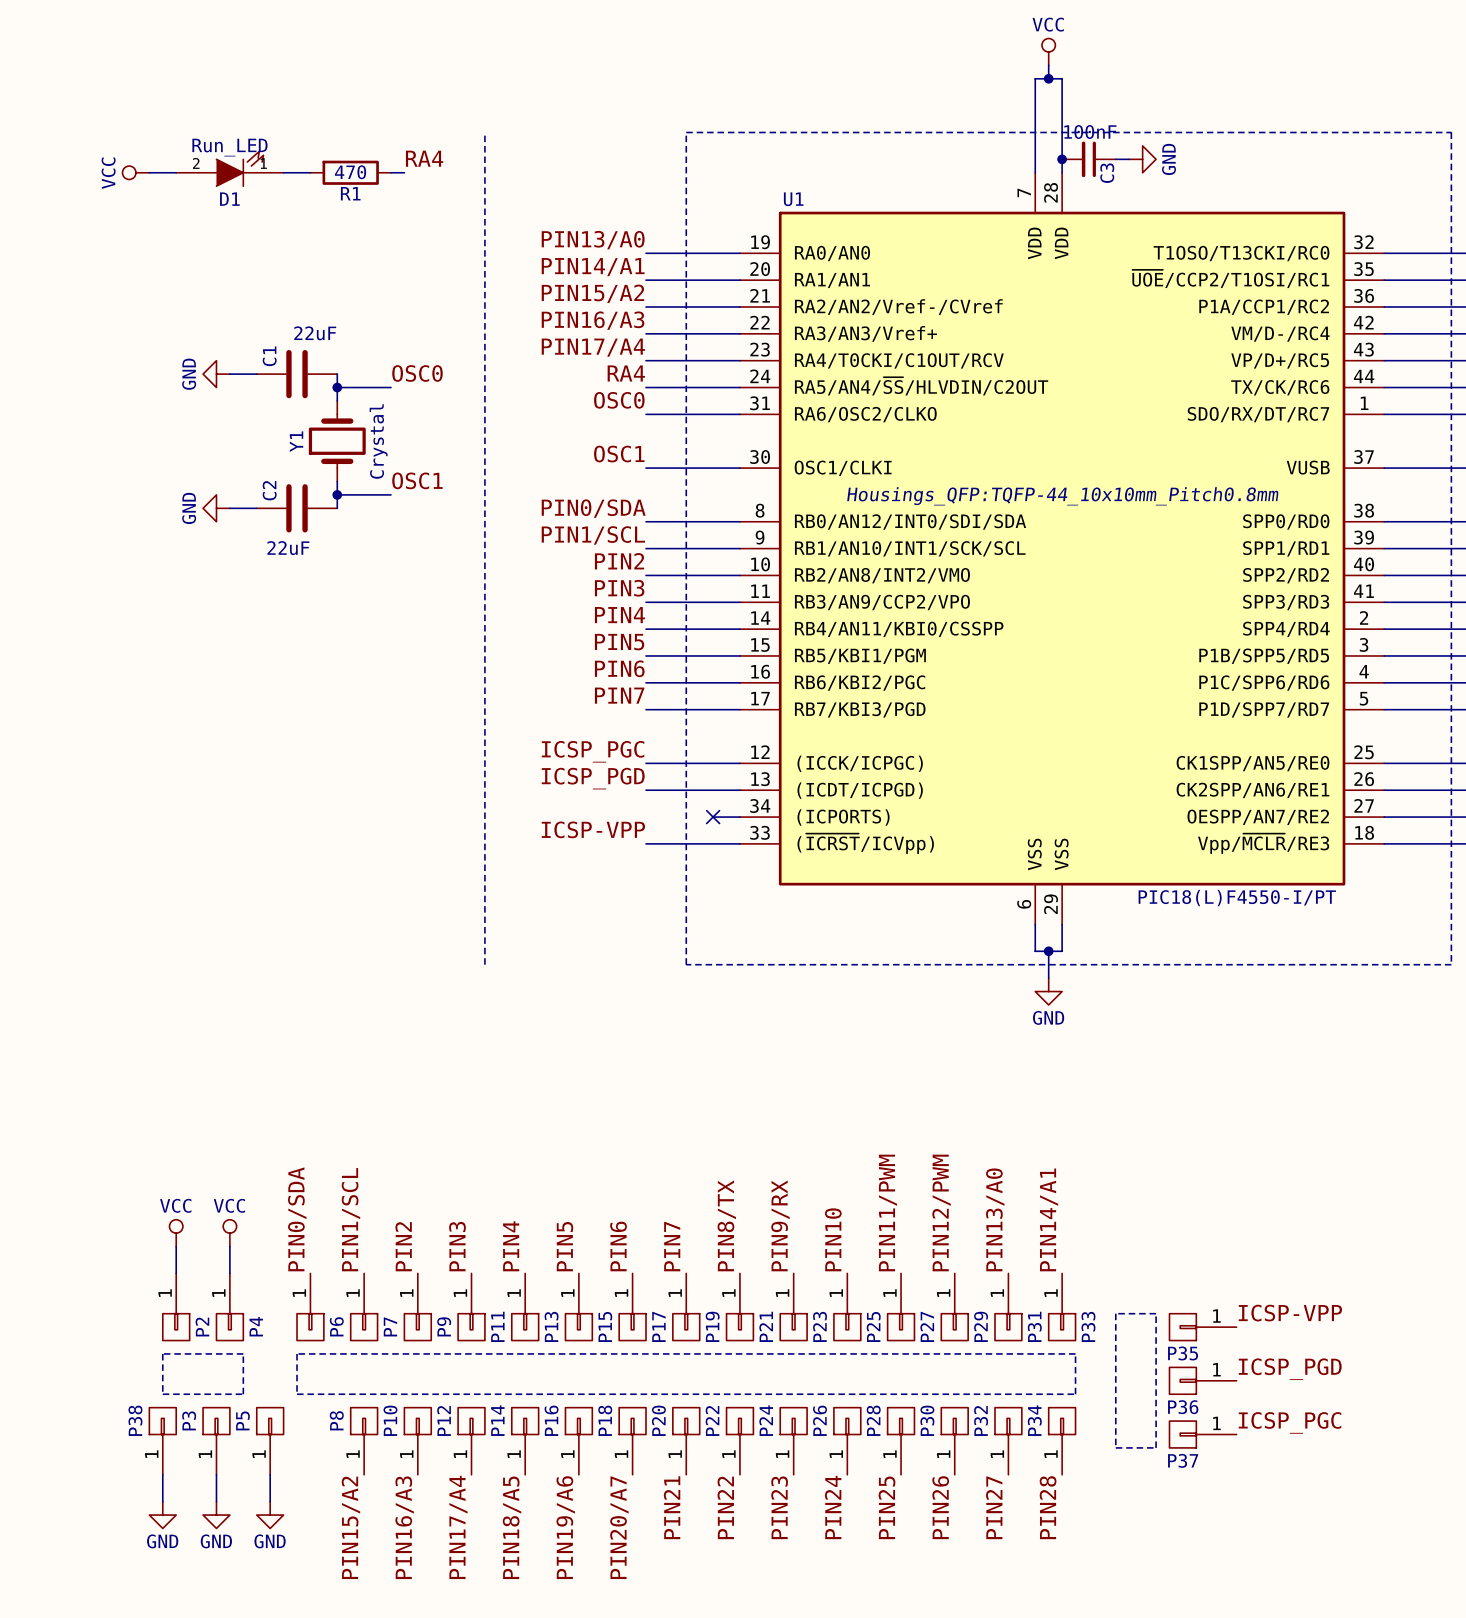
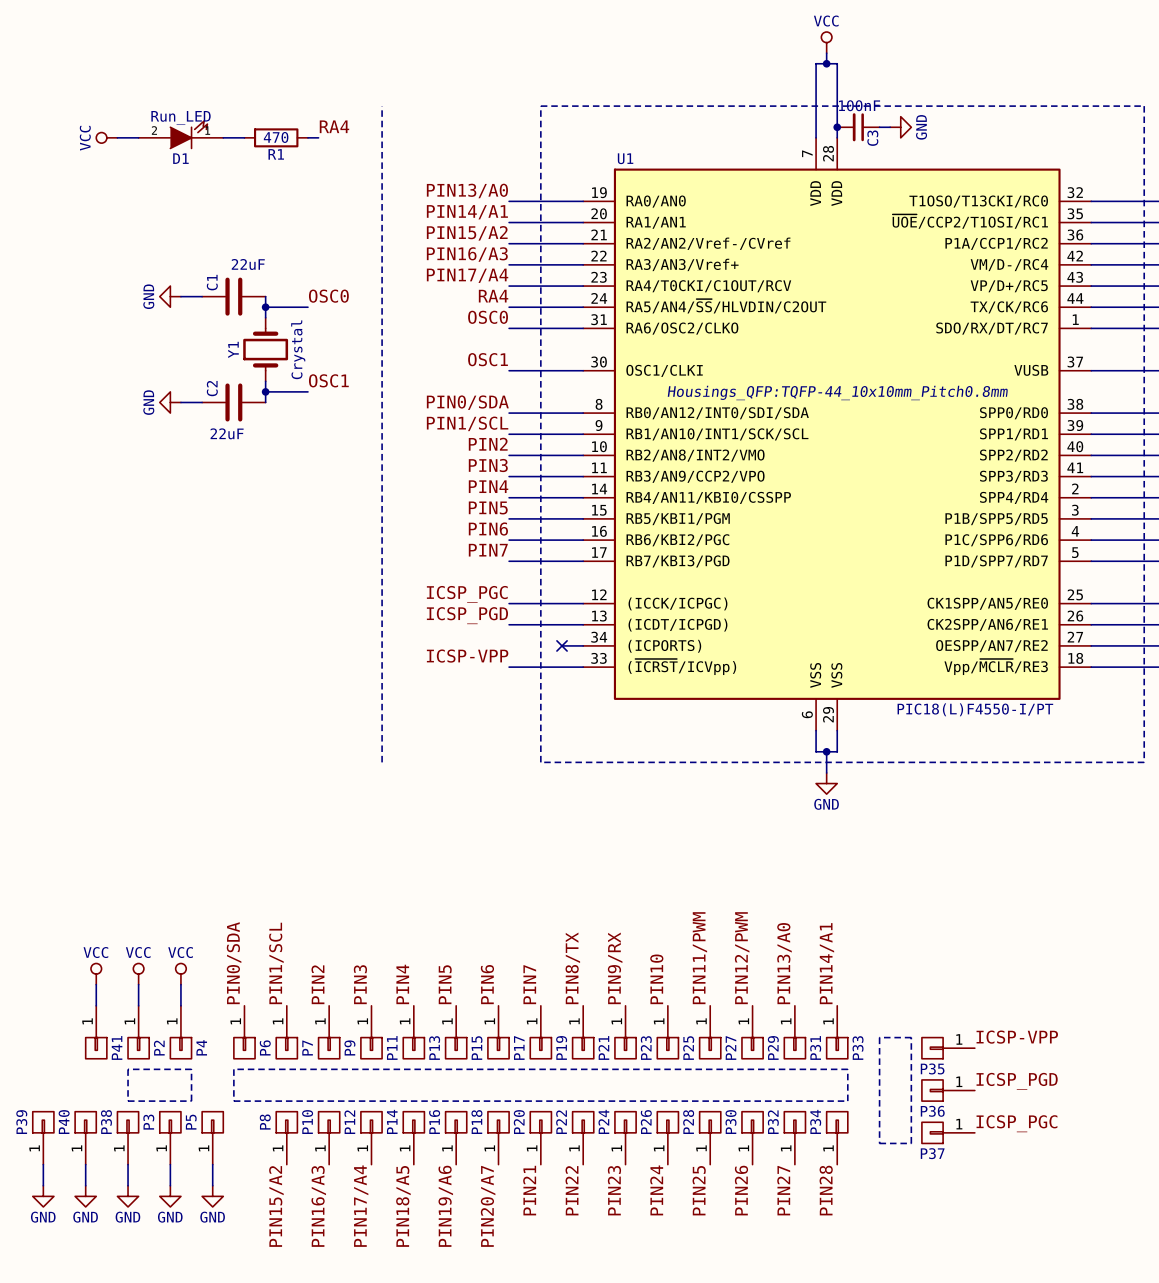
power symbol: none -> VCC (96, 974)
wire: none -> (96, 984) (96, 1005)
P41: none -> (96, 1032)
P39: none -> (43, 1138)
P40: none -> (85, 1138)
wire: none -> (43, 1164) (43, 1185)
wire: none -> (85, 1164) (85, 1185)
power symbol: none -> GND (43, 1196)
power symbol: none -> GND (85, 1196)

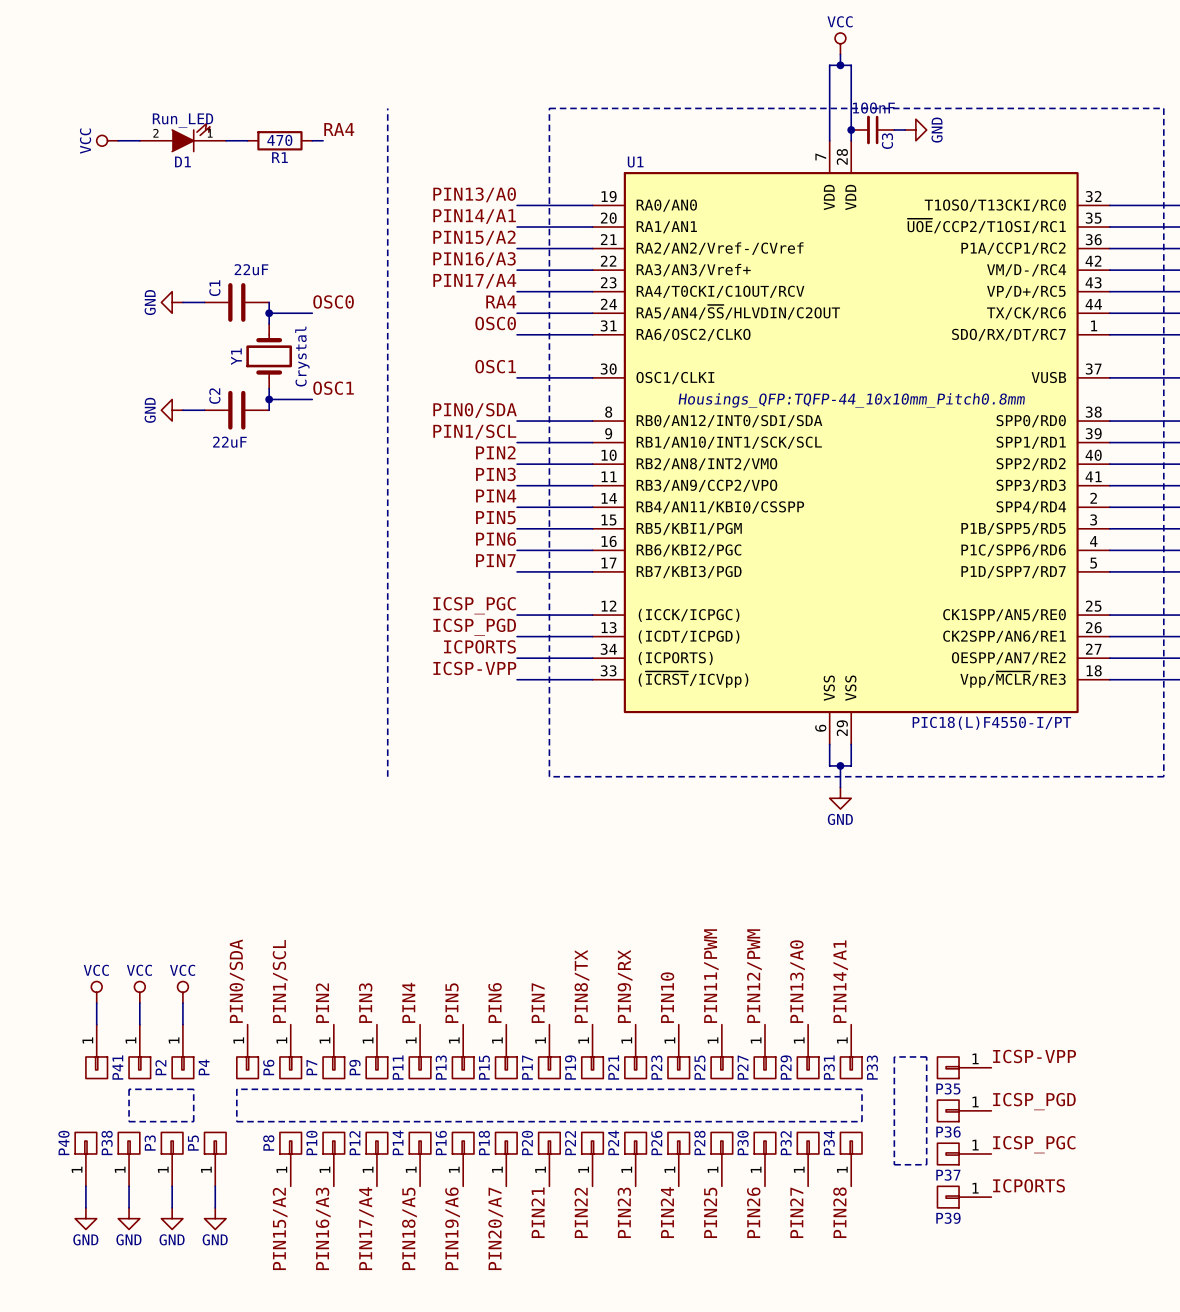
label: none -> ICPORTS (479, 646)
wire: none -> (517, 658) (570, 658)
no-connect mark: (562, 645) -> none
P39 rotation: 0° (43, 1122) -> 90° counterclockwise (948, 1197)
P39 position: (43, 1138) -> (964, 1197)
wire: (43, 1164) (43, 1185) -> none
label: none -> ICPORTS (1029, 1185)
power symbol: GND (43, 1196) -> none

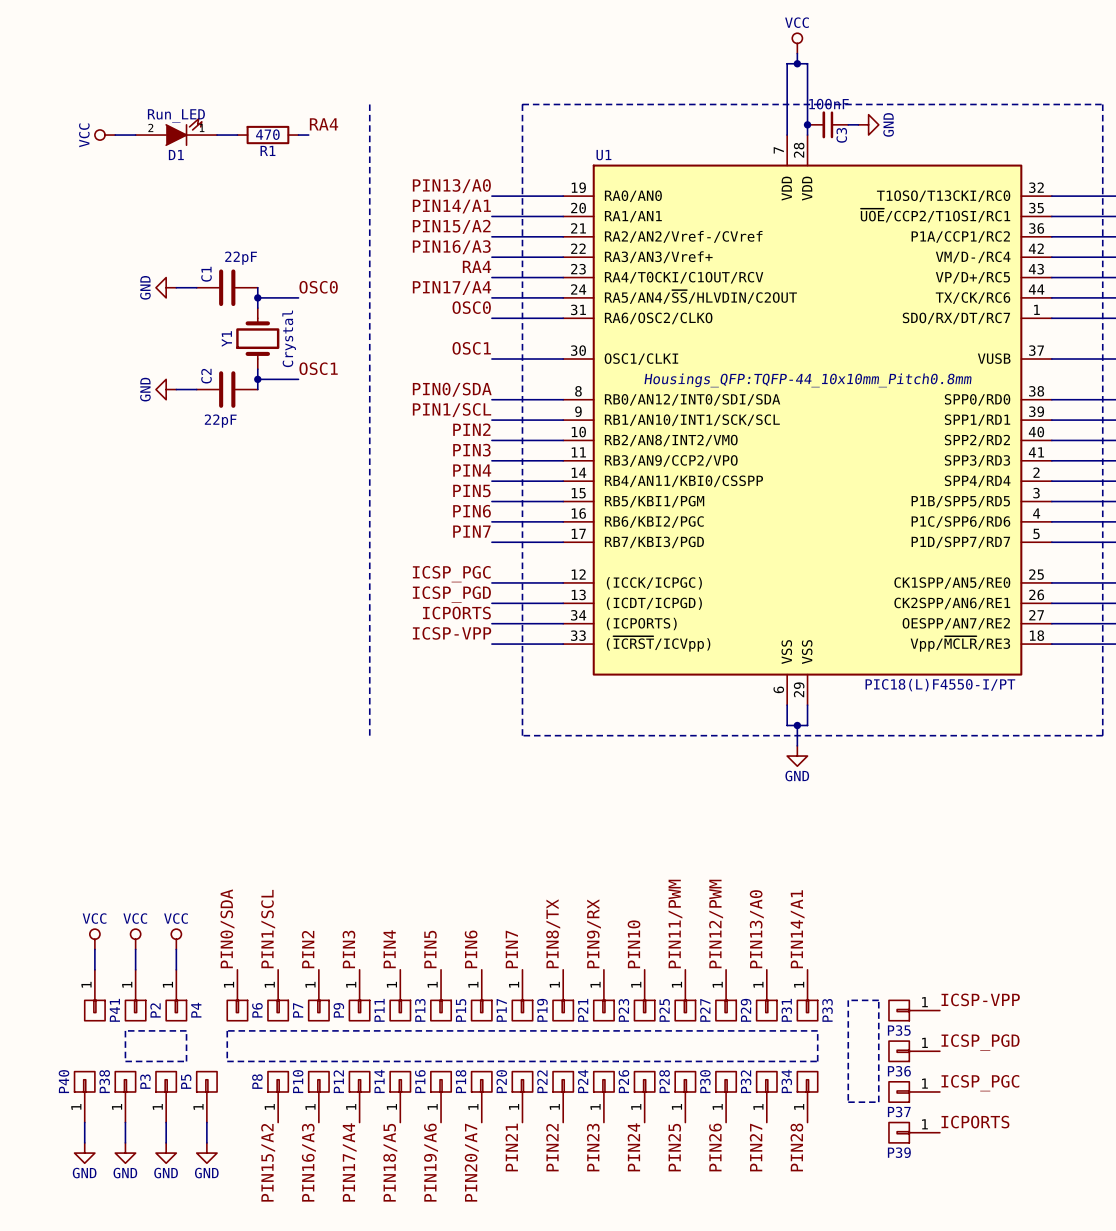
C1 value: 22uF (251, 269) -> 22pF (241, 258)
label: PIN17/A4 (474, 281) -> RA4 (476, 266)
label: RA4 (501, 301) -> PIN17/A4 (451, 288)
C2 value: 22uF (229, 442) -> 22pF (220, 421)

